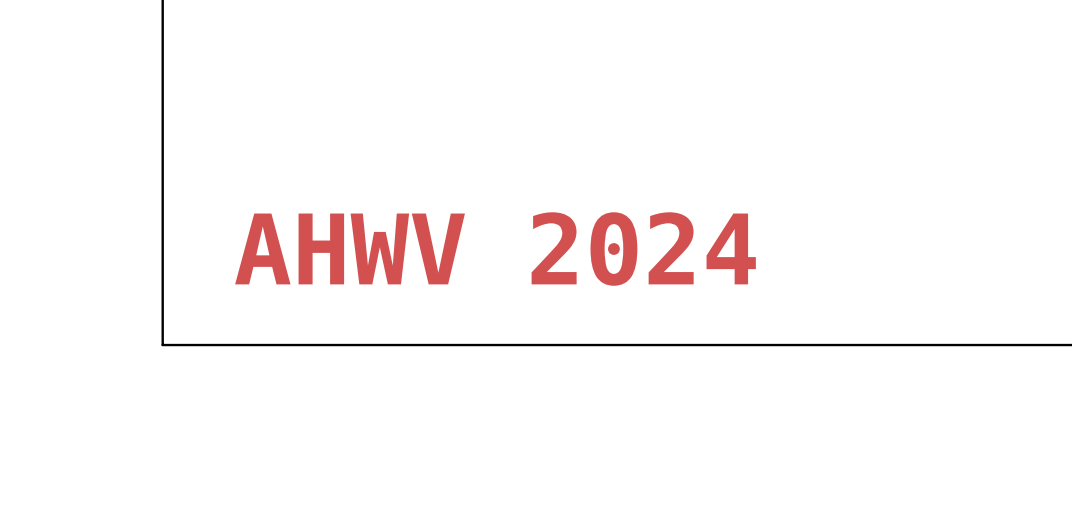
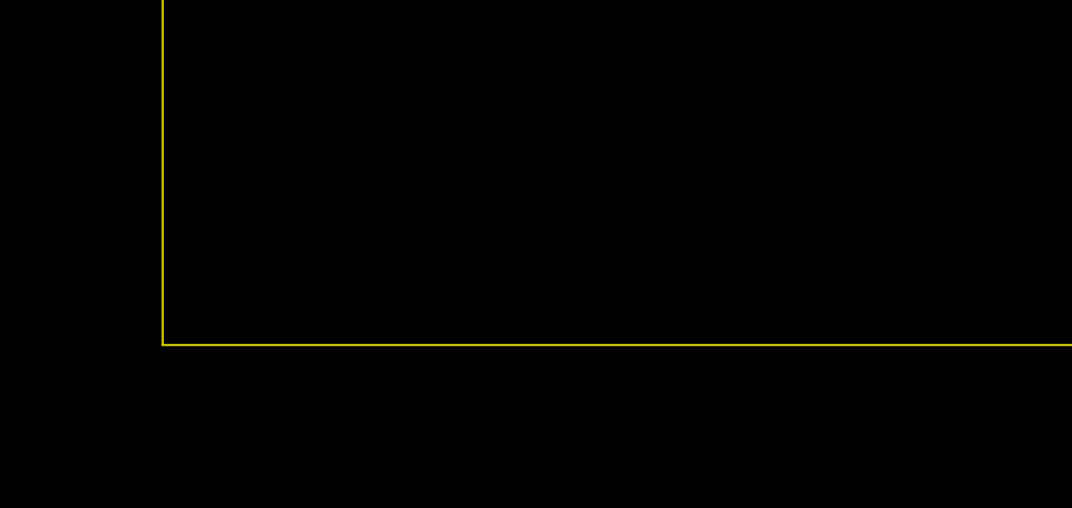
text: AHWV 2024 (495, 249) -> none

